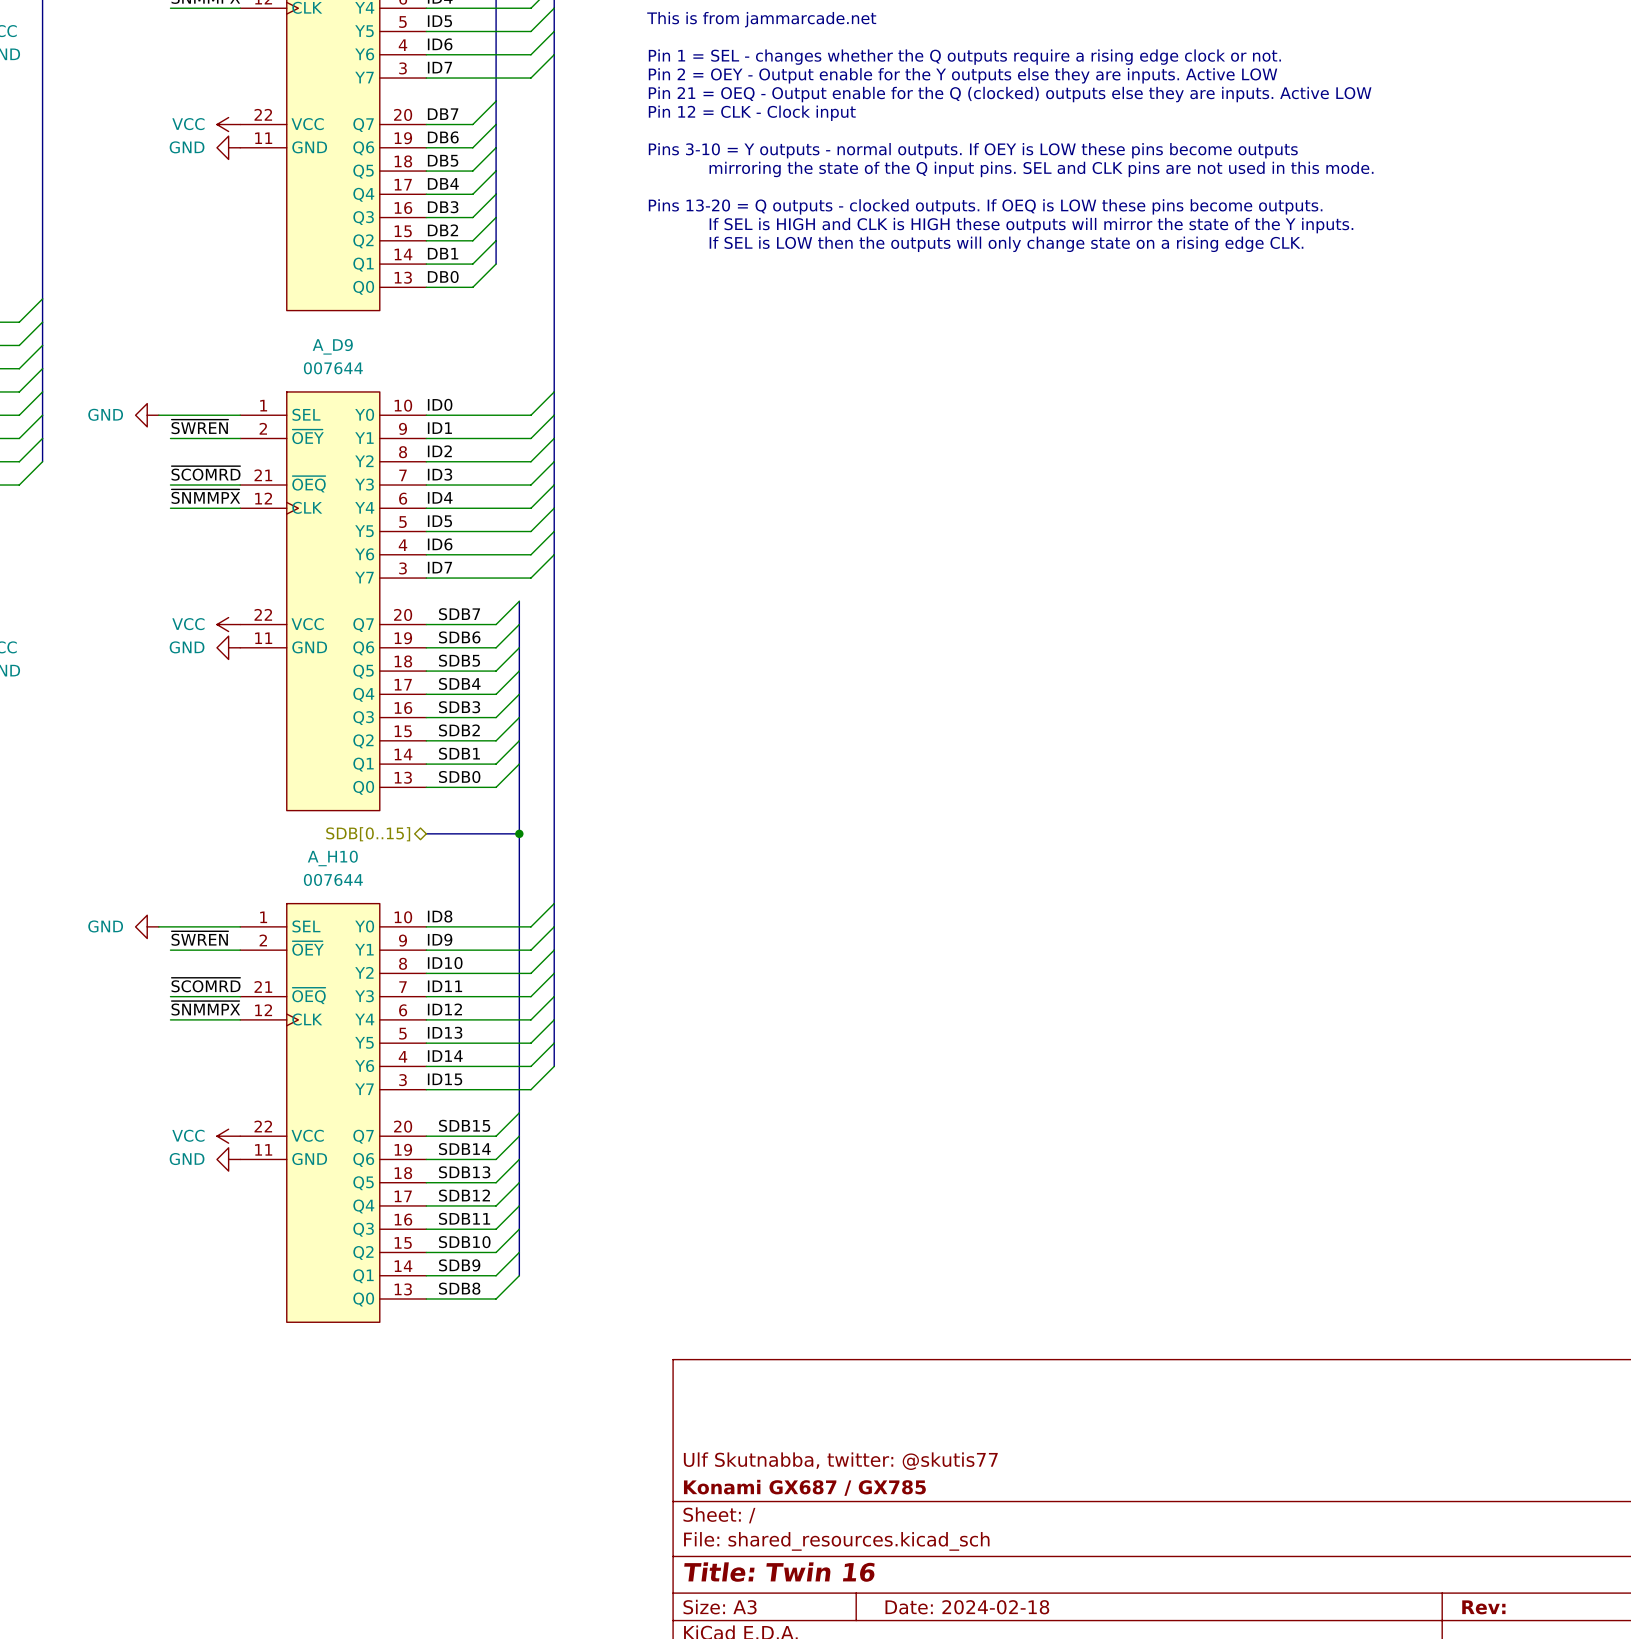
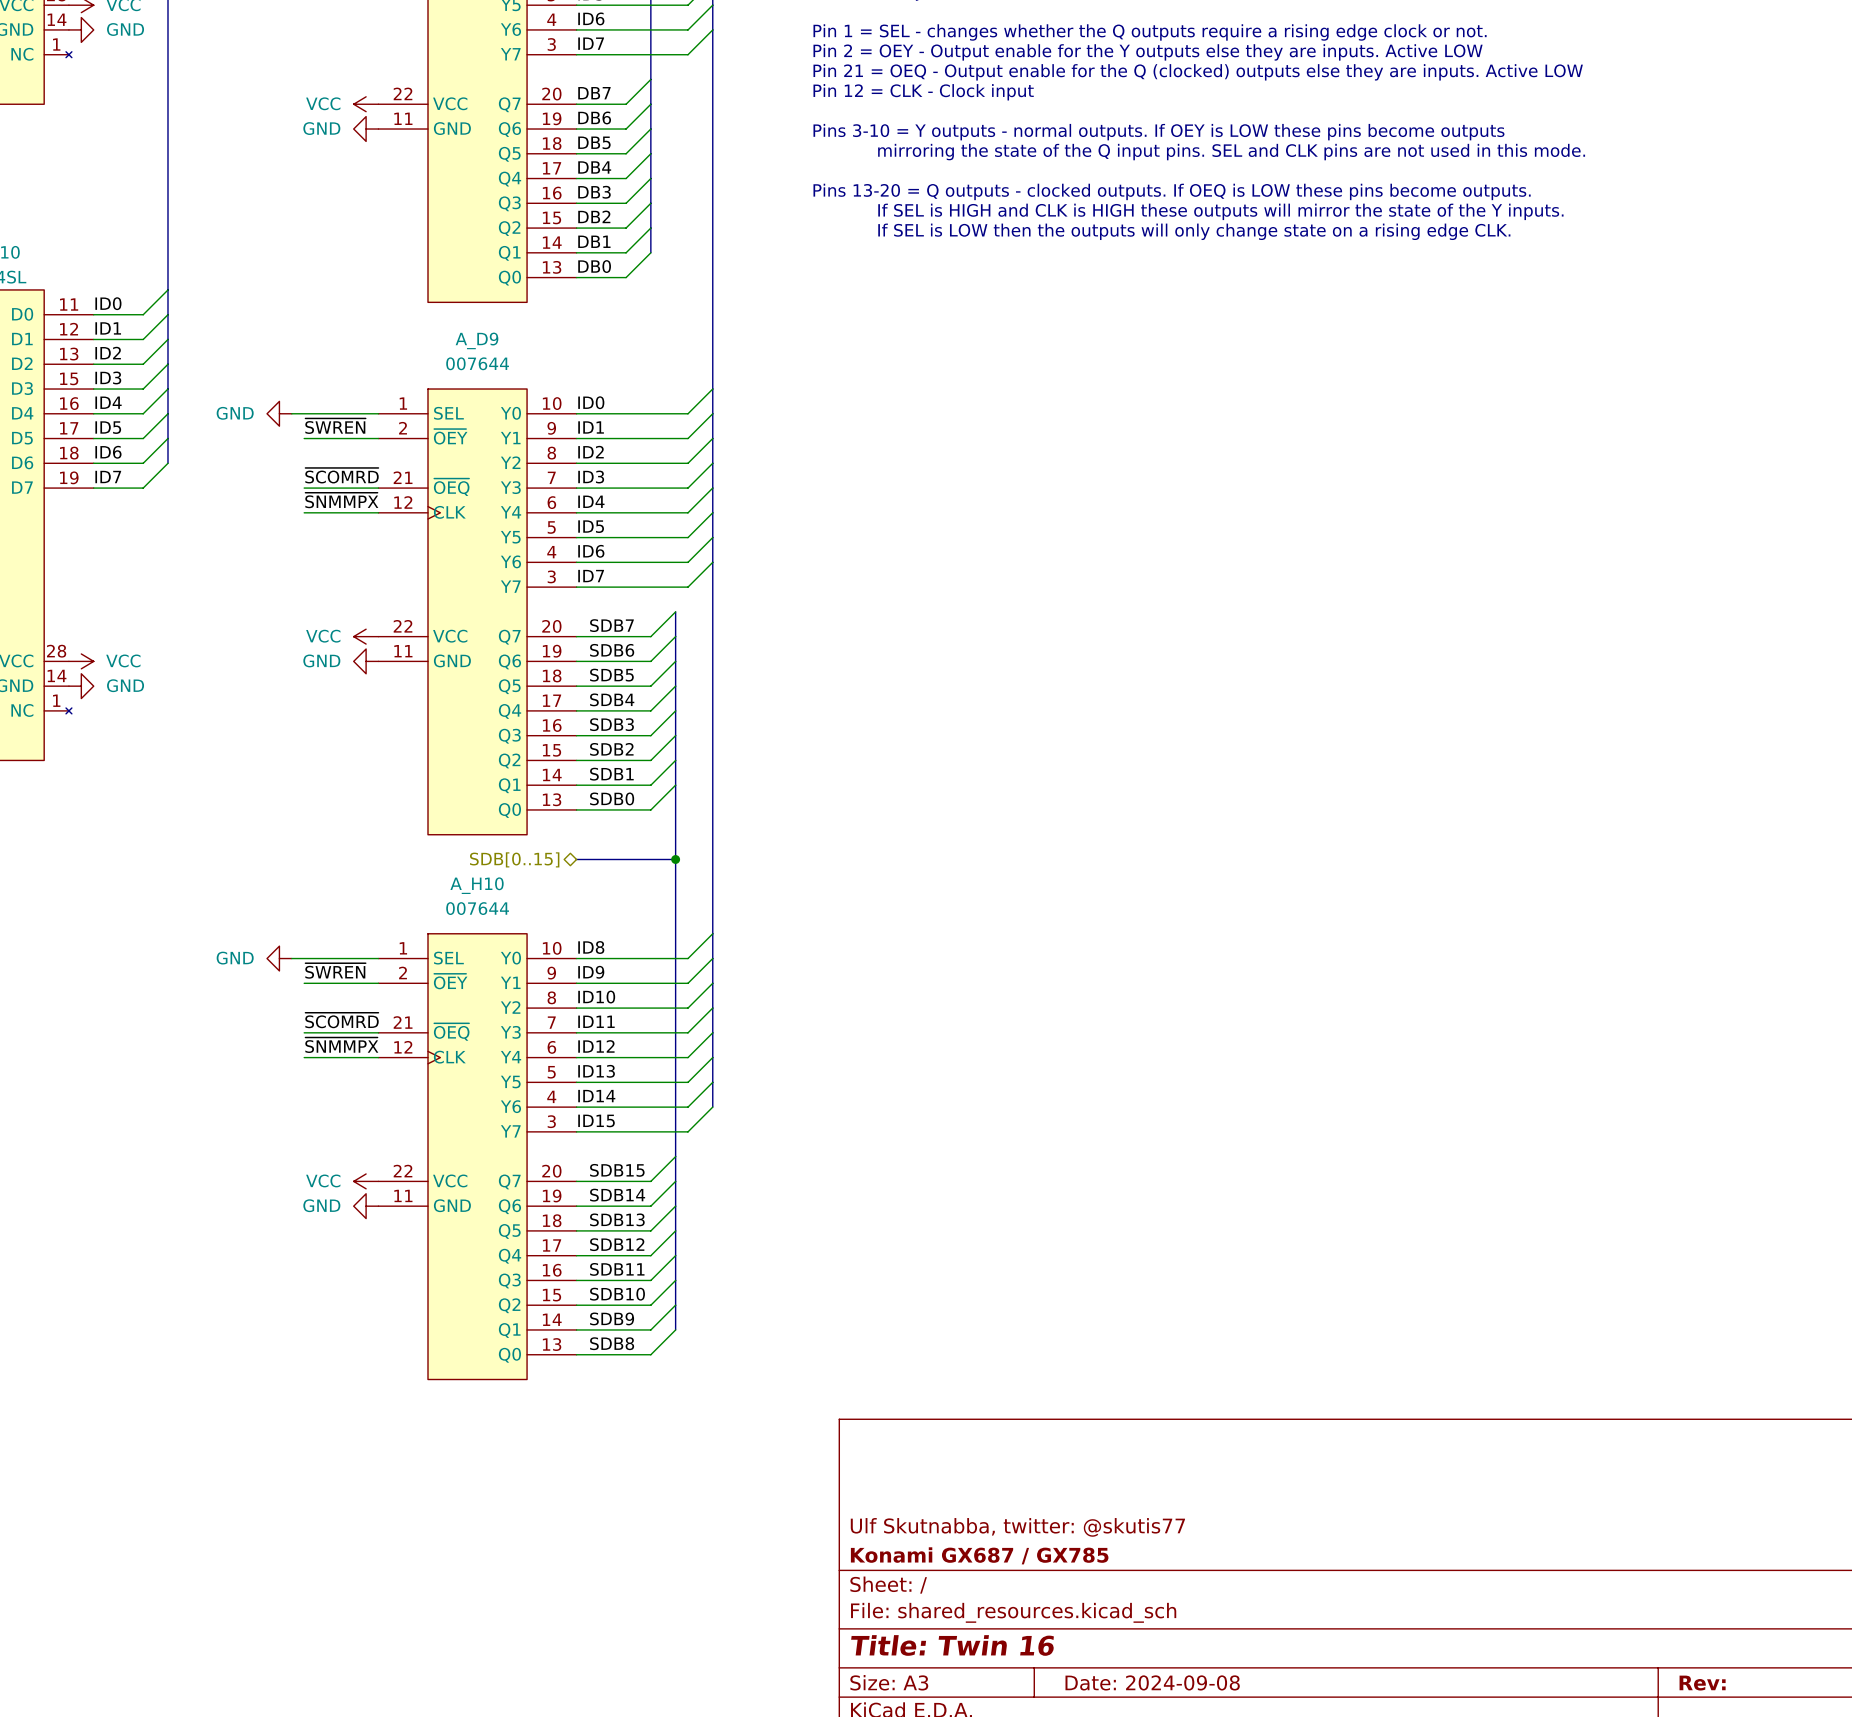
title block: Date: 2024-02-18 (967, 1607) -> Date: 2024-09-08 (1152, 1682)

